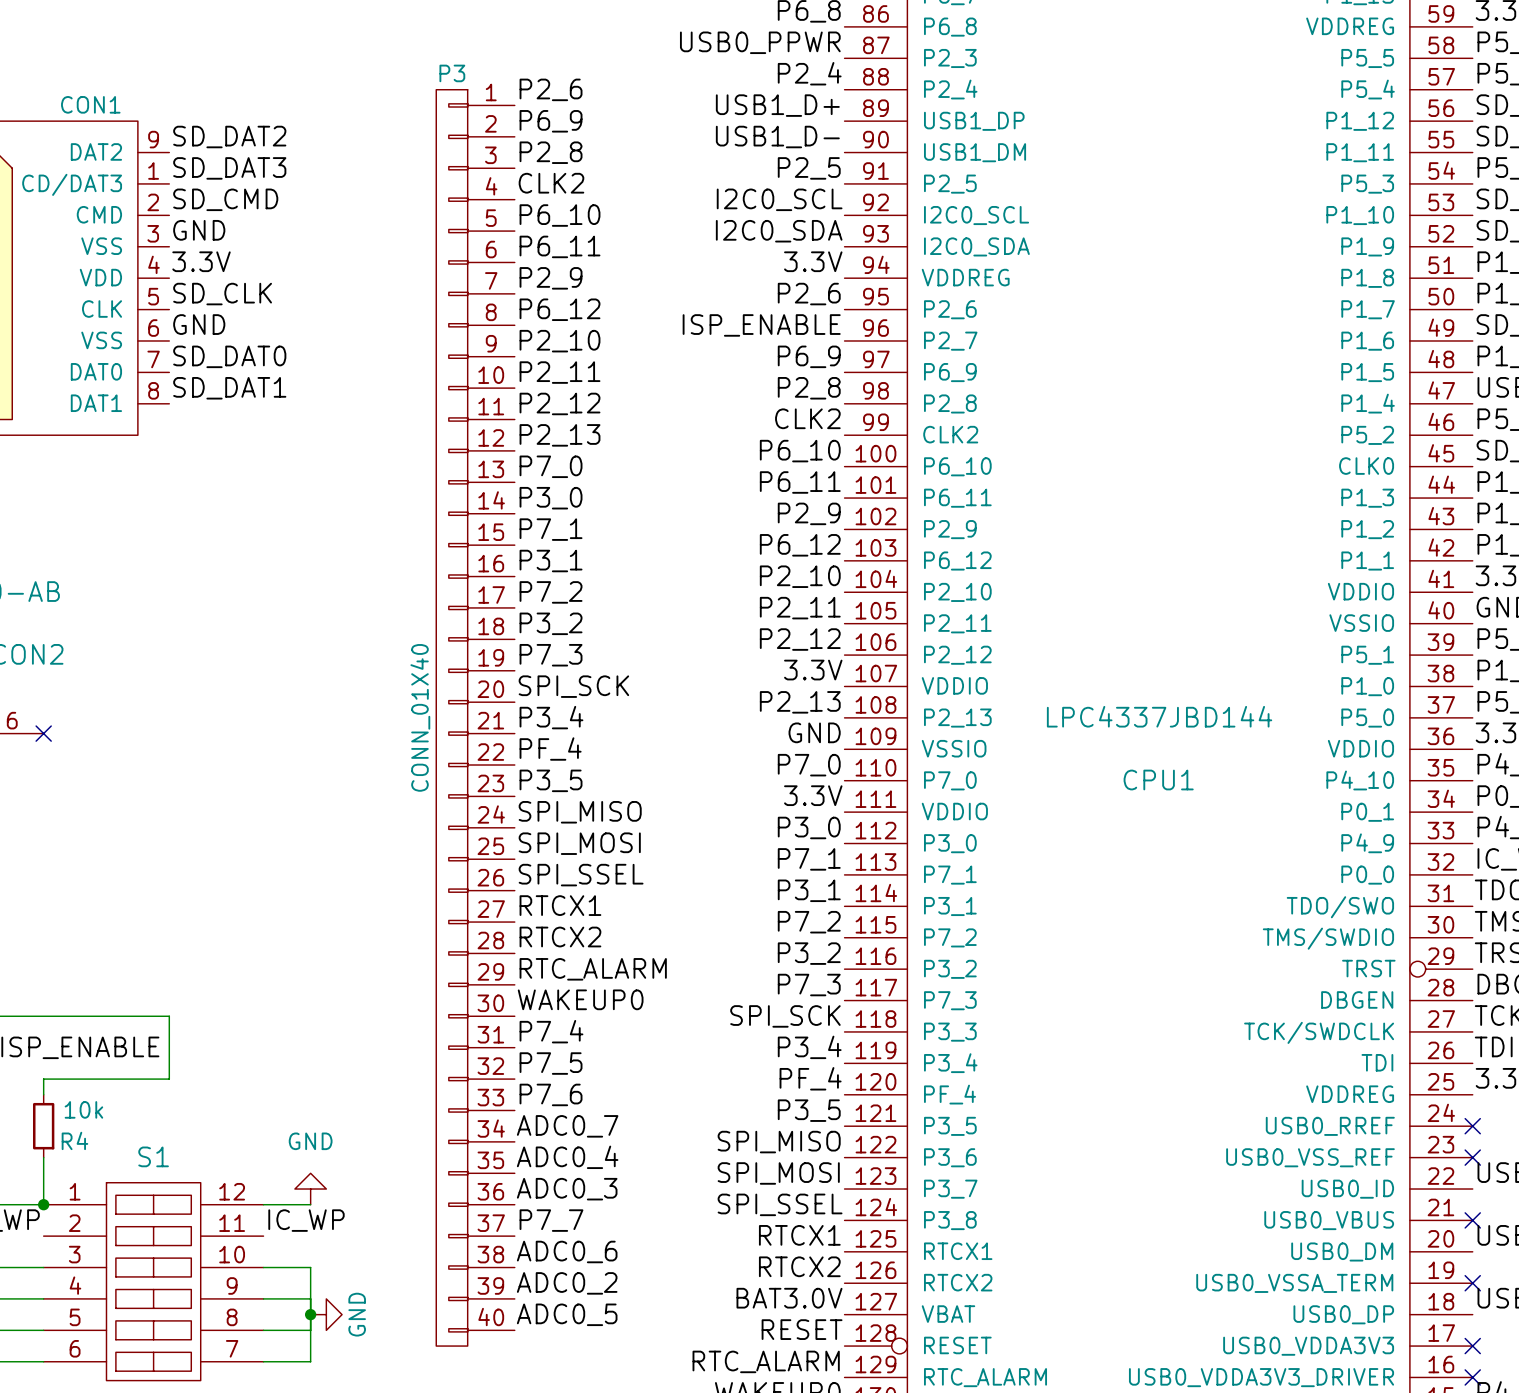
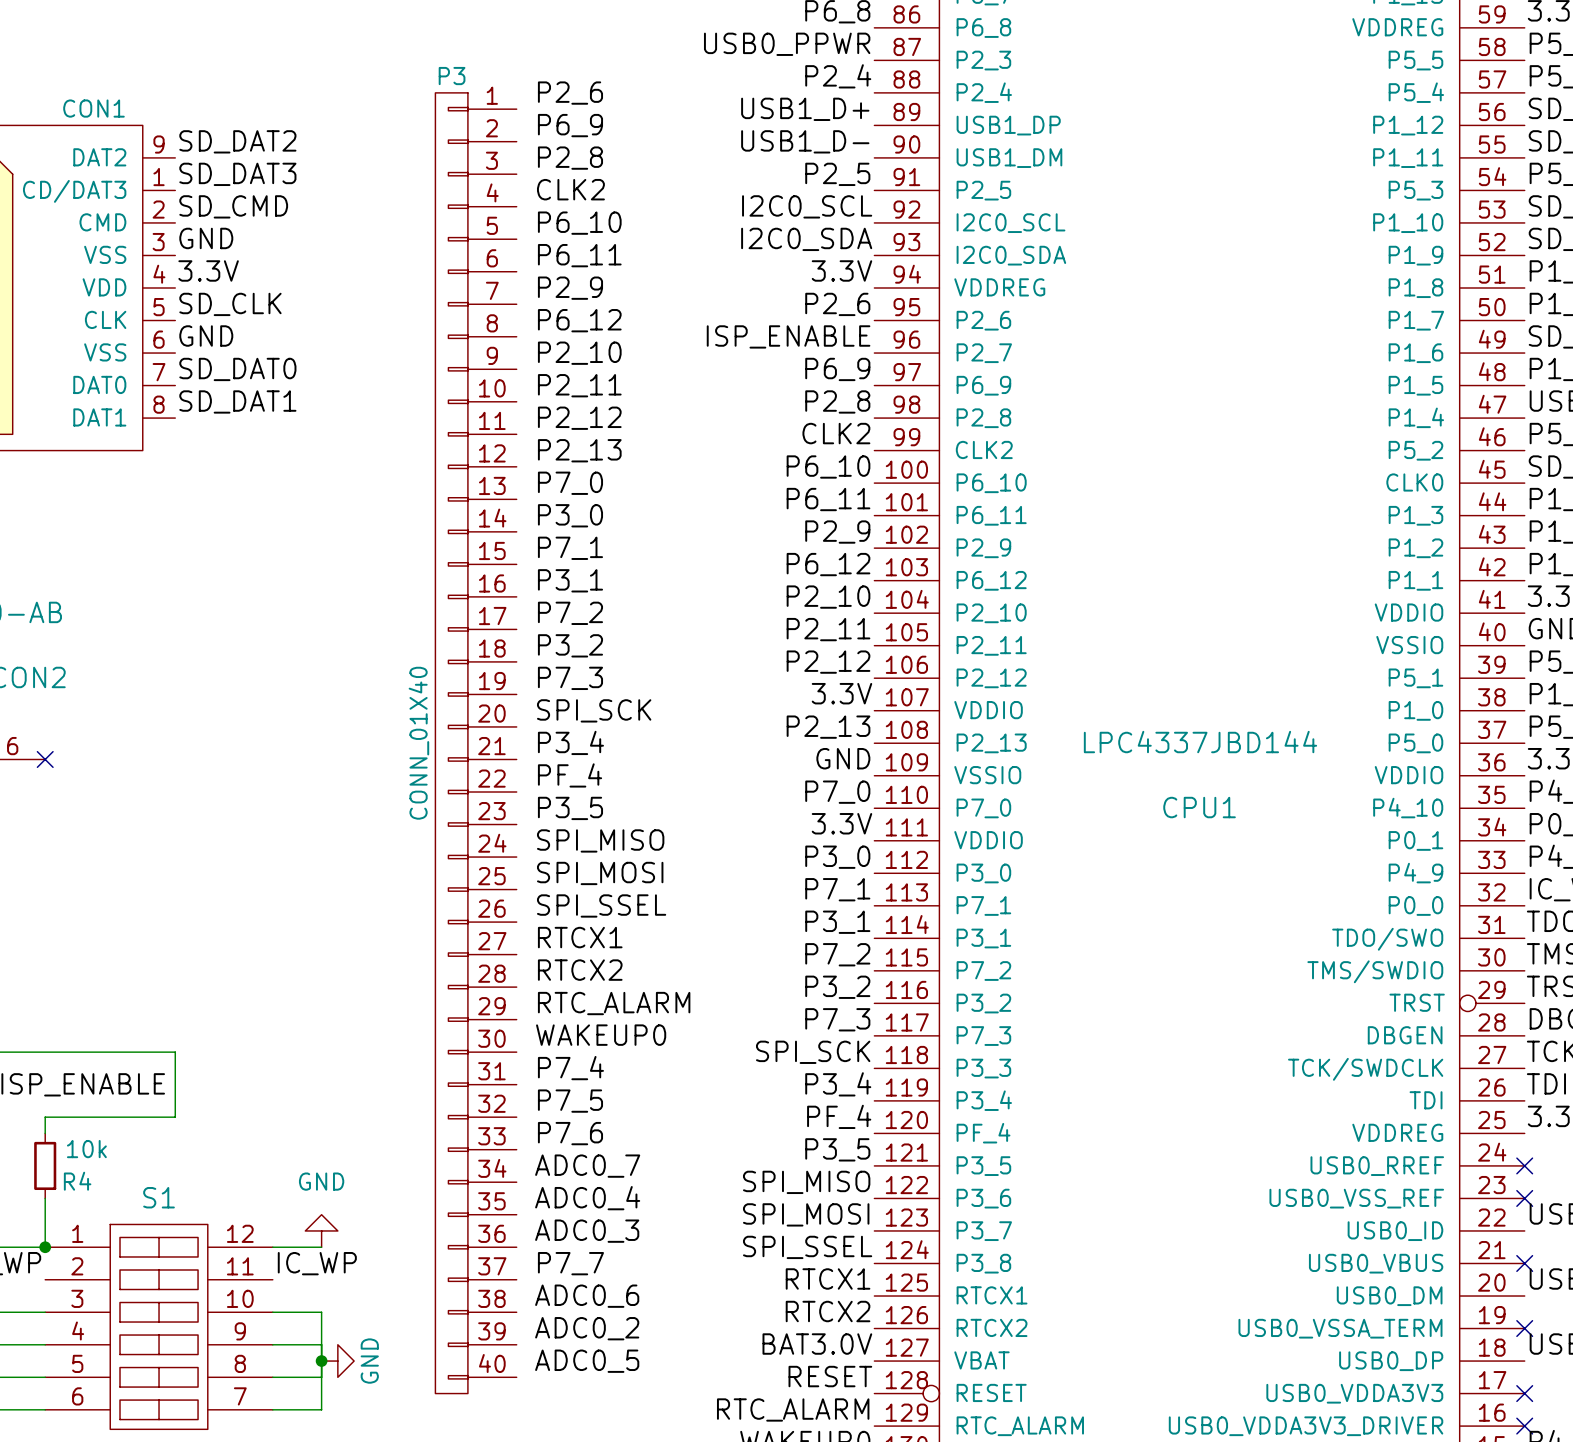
P3 position: (475, 717) -> (476, 743)

